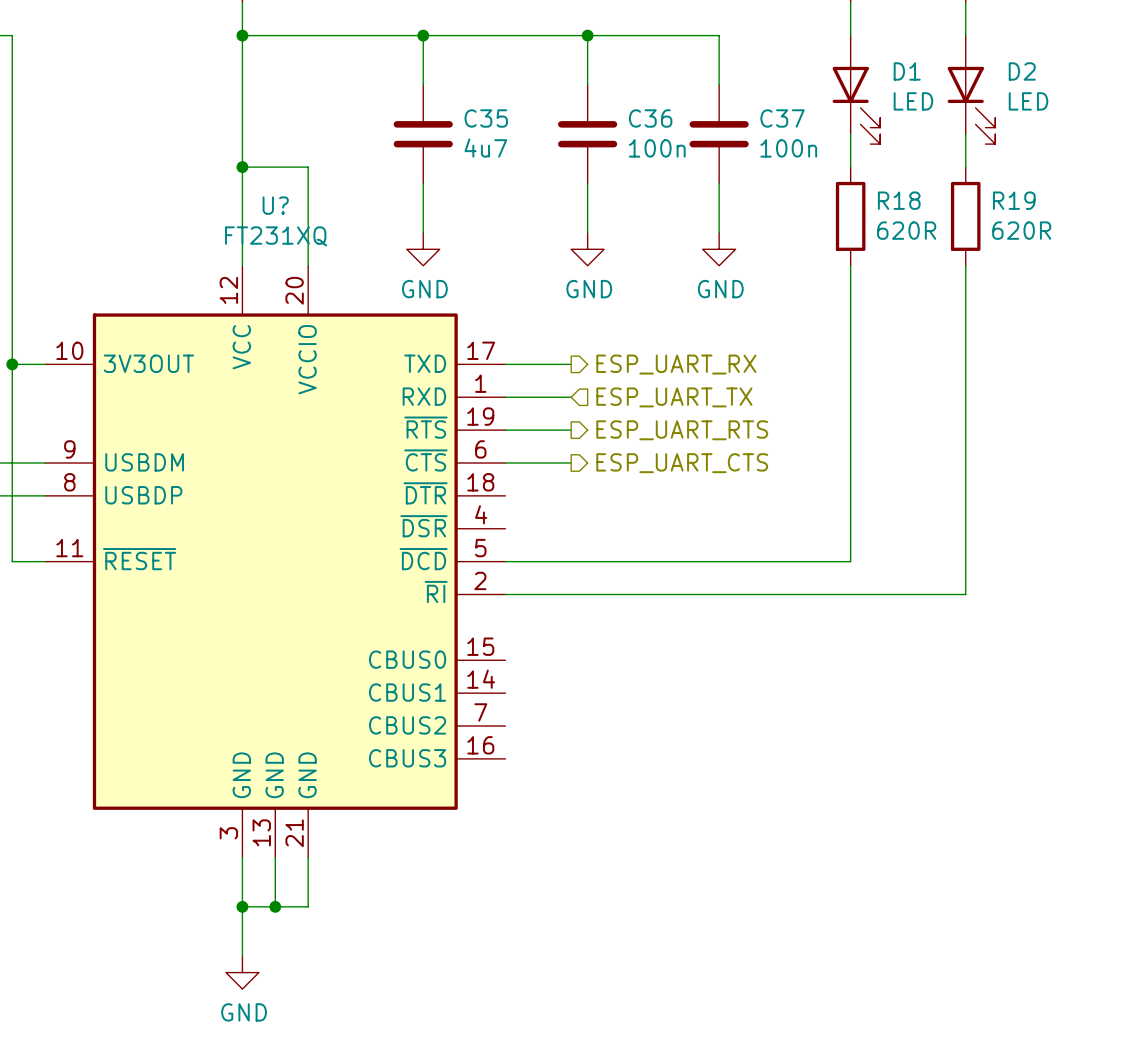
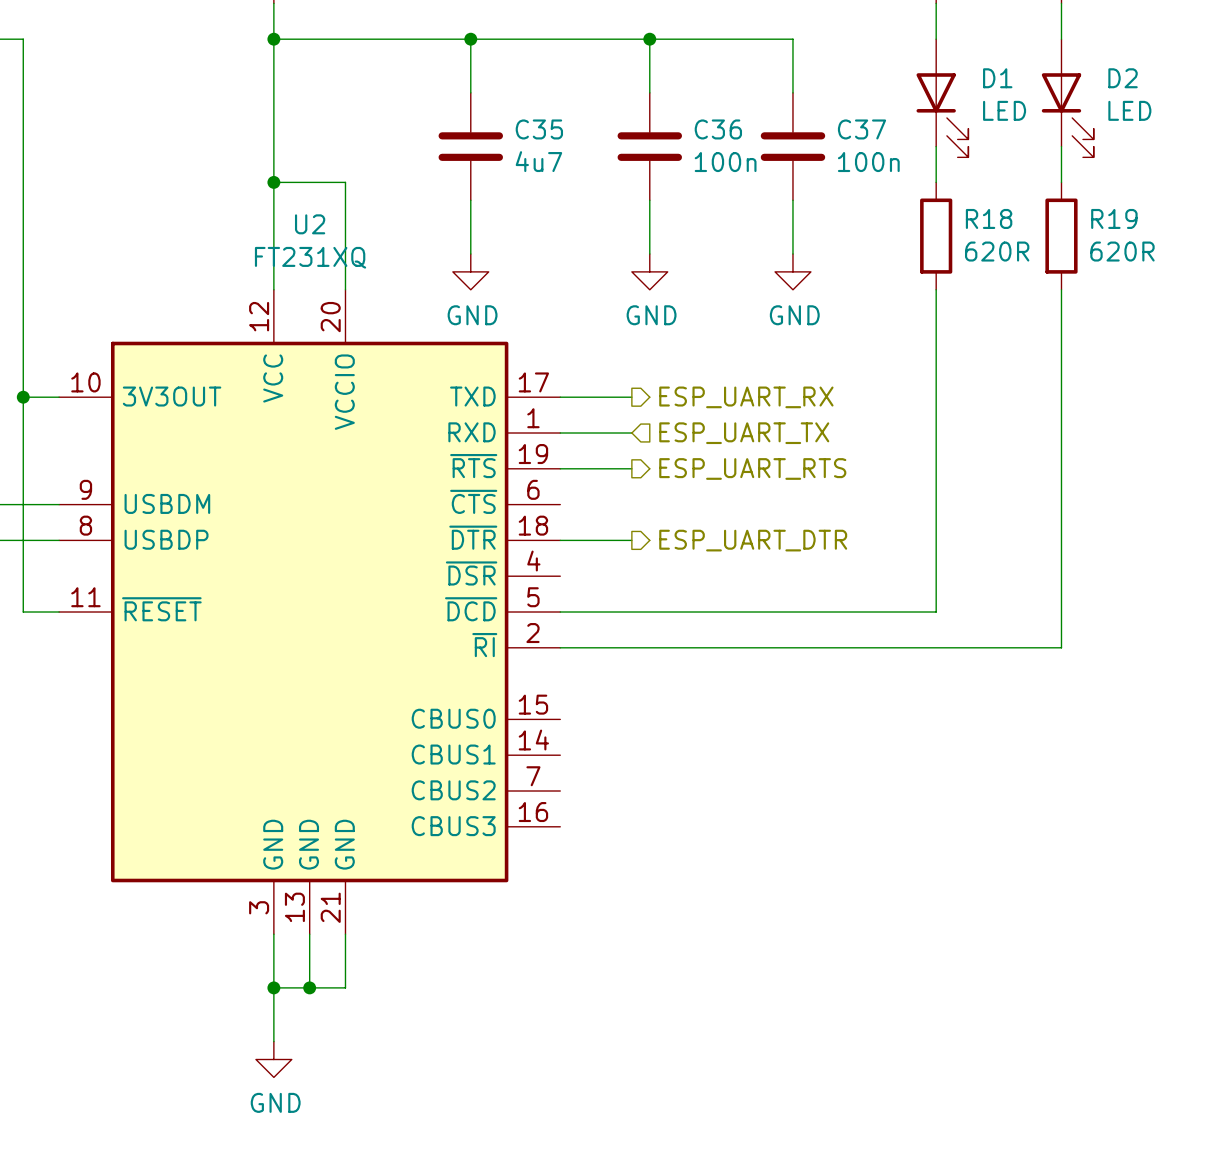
U? name: U? (275, 205) -> U2 (310, 224)
wire: (505, 463) (571, 463) -> (560, 540) (631, 540)
hierarchical label: ESP_UART_CTS (682, 463) -> ESP_UART_DTR (753, 540)

